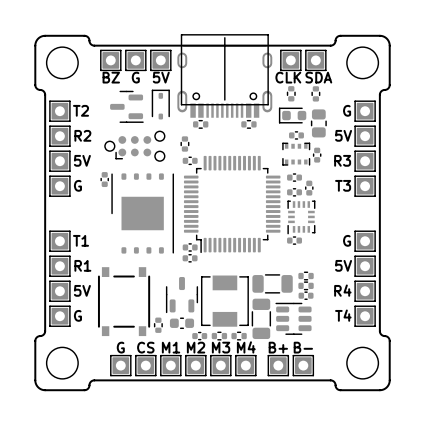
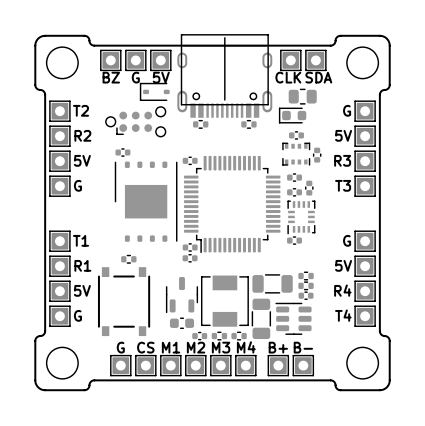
part: (291, 93) -> none
part: (315, 93) -> none
part rotation: 0° (160, 104) -> 90° counterclockwise (154, 91)
part: (126, 106) -> none
part rotation: 0° (318, 123) -> 90° clockwise (302, 96)
part position: (318, 123) -> (302, 96)
part: (184, 143) -> none
part position: (134, 146) -> (135, 121)
part rotation: 0° (104, 179) -> 90° clockwise (122, 152)
part position: (104, 179) -> (122, 152)
part position: (142, 213) -> (146, 201)
part: none -> (128, 259)
part: (158, 325) -> none

